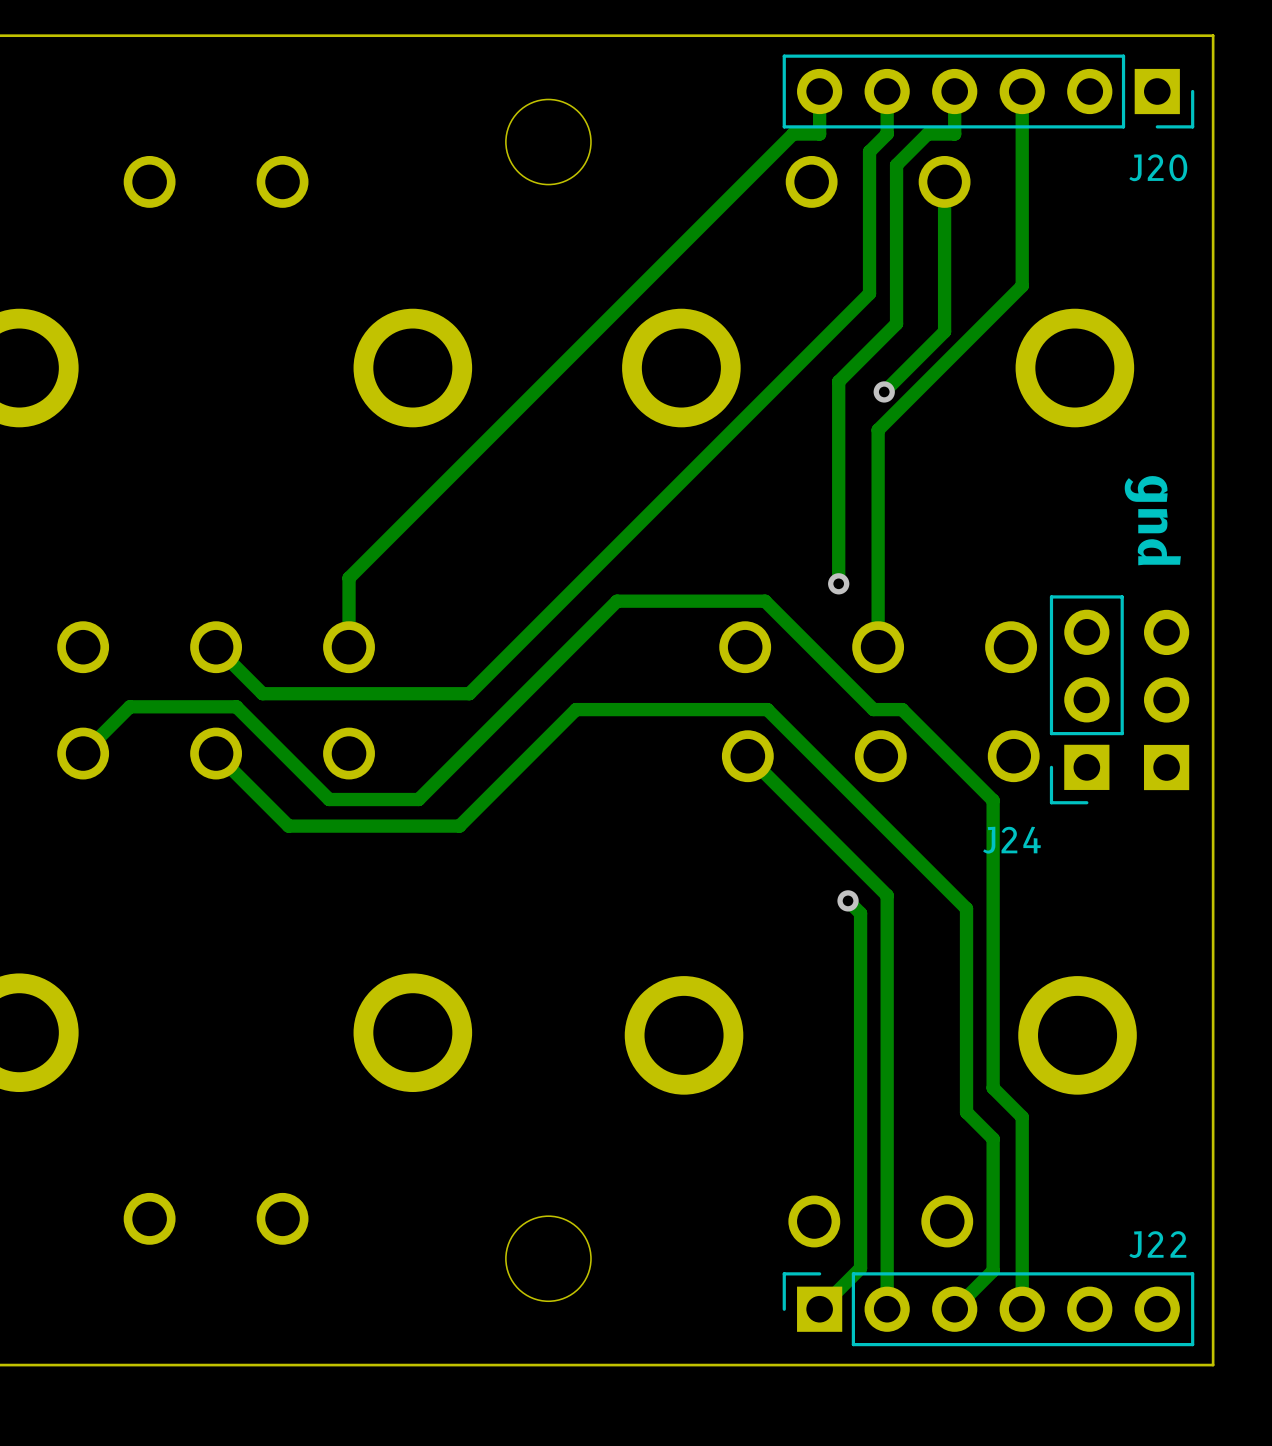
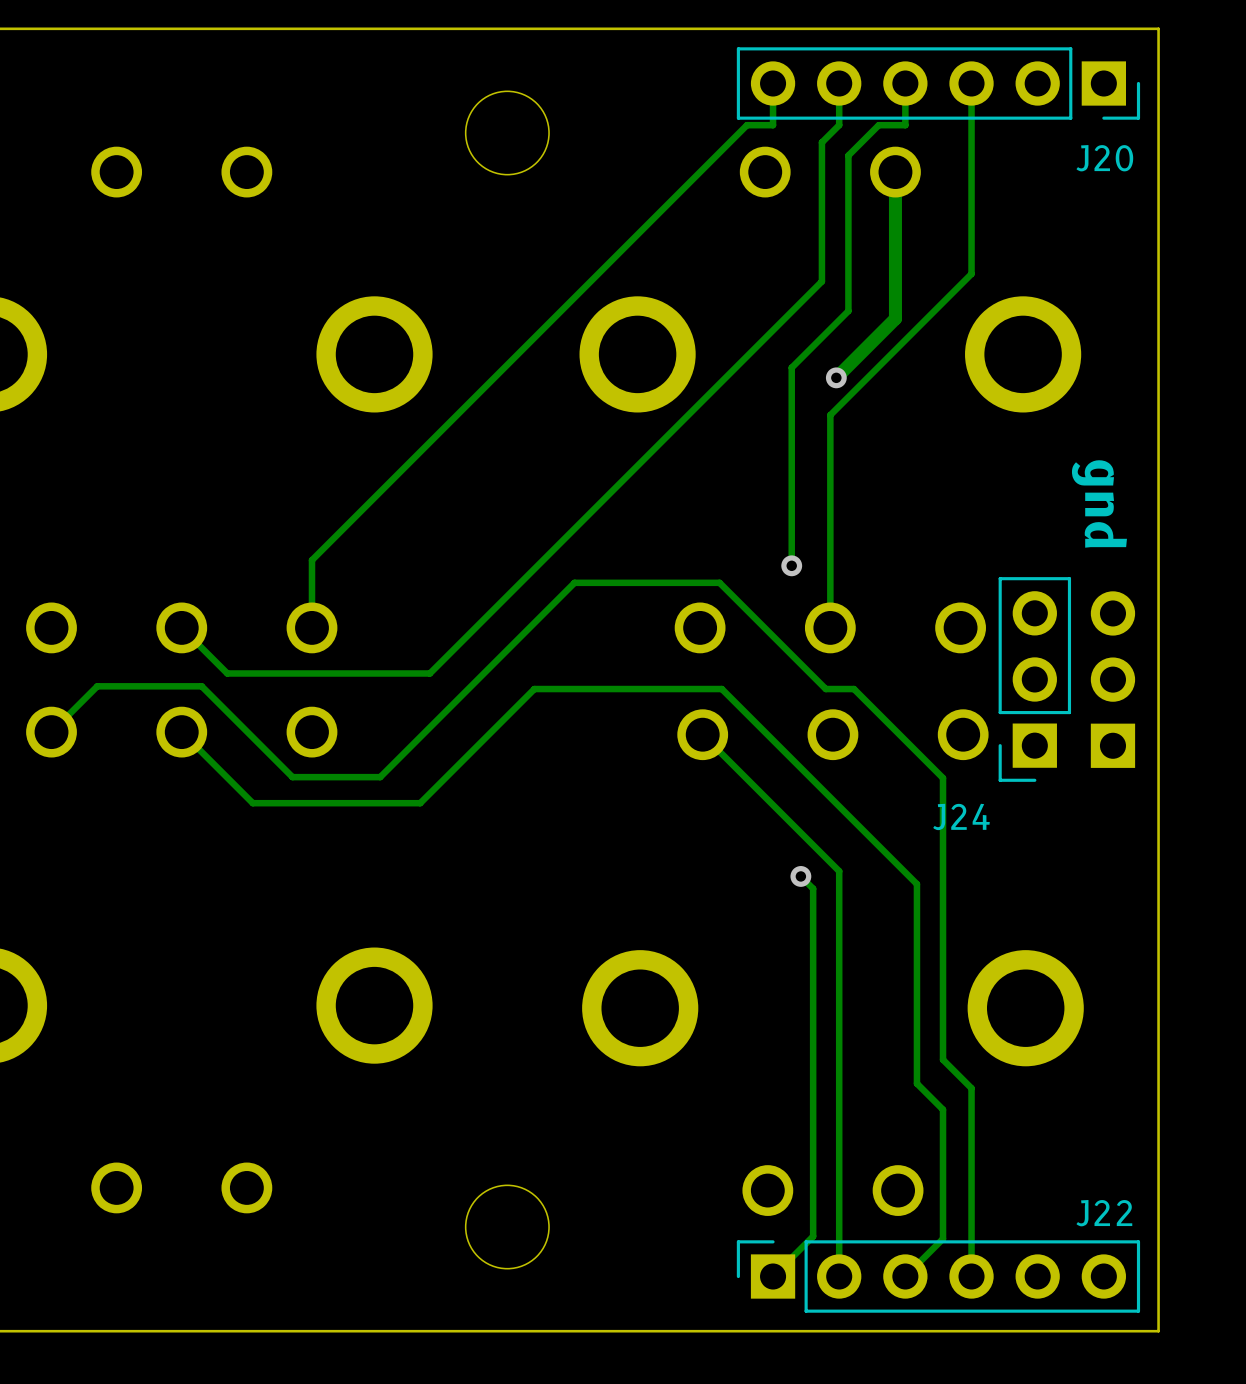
track width: thick (819, 91) (819, 134) (793, 134) (349, 578) (349, 647) -> thin (773, 83) (773, 125) (746, 125) (311, 560) (311, 627)
track width: thick (887, 91) (887, 134) (869, 151) (869, 293) (469, 693) (262, 693) (216, 647) -> thin (839, 83) (839, 125) (821, 142) (821, 281) (429, 673) (227, 673) (181, 627)
track width: thick (954, 91) (954, 134) (927, 134) (896, 165) (896, 323) (838, 381) (838, 583) -> thin (905, 83) (905, 125) (878, 125) (848, 155) (848, 311) (791, 367) (791, 565)
track width: thick (1022, 91) (1022, 285) (878, 430) (878, 647) -> thin (971, 83) (971, 273) (830, 415) (830, 627)
track width: thick (83, 753) (129, 706) (236, 706) (329, 799) (418, 799) (617, 601) (765, 601) (873, 709) (902, 709) (993, 800) (993, 1088) (1022, 1117) (1022, 1309) -> thin (51, 732) (97, 686) (201, 686) (292, 777) (380, 777) (574, 582) (719, 582) (825, 689) (853, 689) (943, 778) (943, 1059) (971, 1088) (971, 1276)
track width: thick (216, 753) (288, 826) (459, 826) (576, 709) (767, 709) (966, 908) (966, 1112) (993, 1138) (993, 1270) (954, 1309) -> thin (181, 732) (252, 803) (420, 803) (534, 689) (721, 689) (916, 884) (916, 1083) (943, 1109) (943, 1238) (905, 1276)
track width: thick (747, 756) (887, 895) (887, 1309) -> thin (702, 734) (839, 871) (839, 1276)
track width: thick (848, 900) (860, 913) (860, 1268) (819, 1309) -> thin (800, 876) (813, 888) (813, 1236) (773, 1276)

